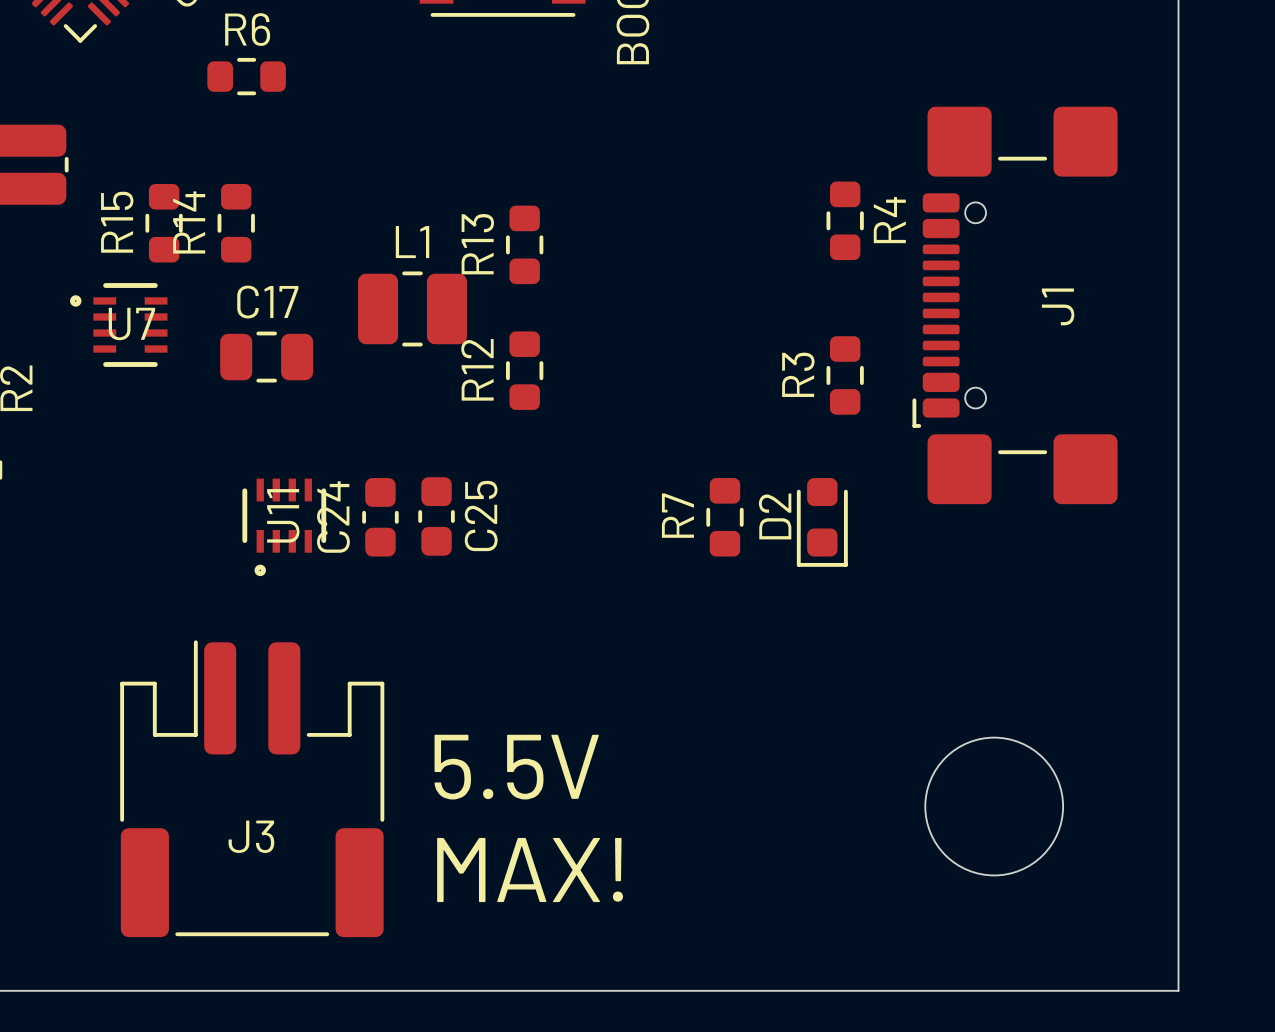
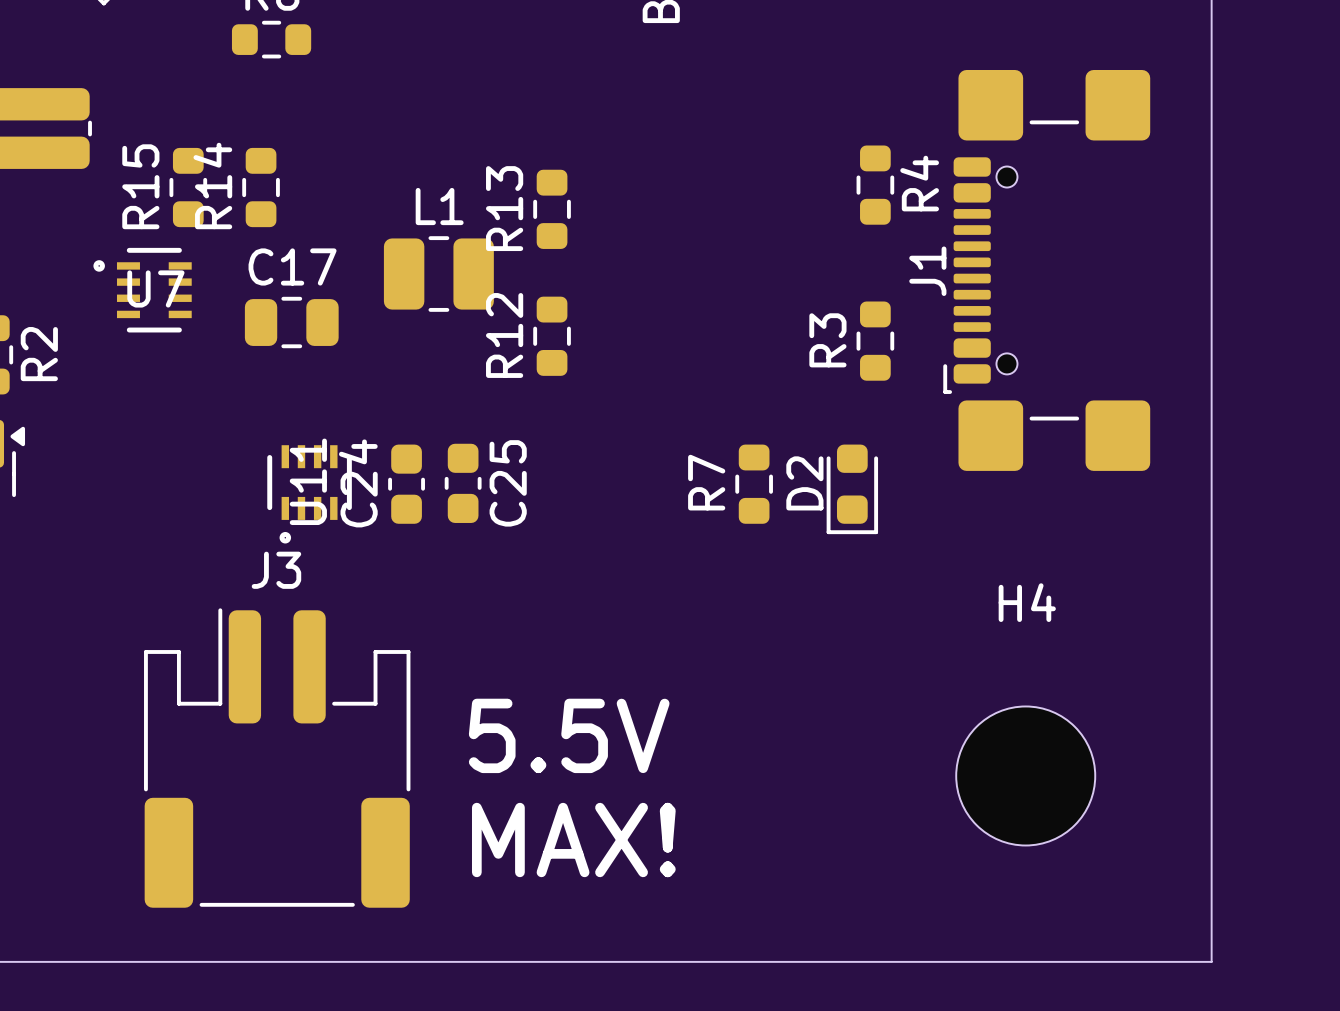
J1 name position: J1 (1058, 306) -> J1 (927, 271)
H4 name: none -> H4 (1027, 602)
J3 name position: J3 (251, 836) -> J3 (276, 570)

